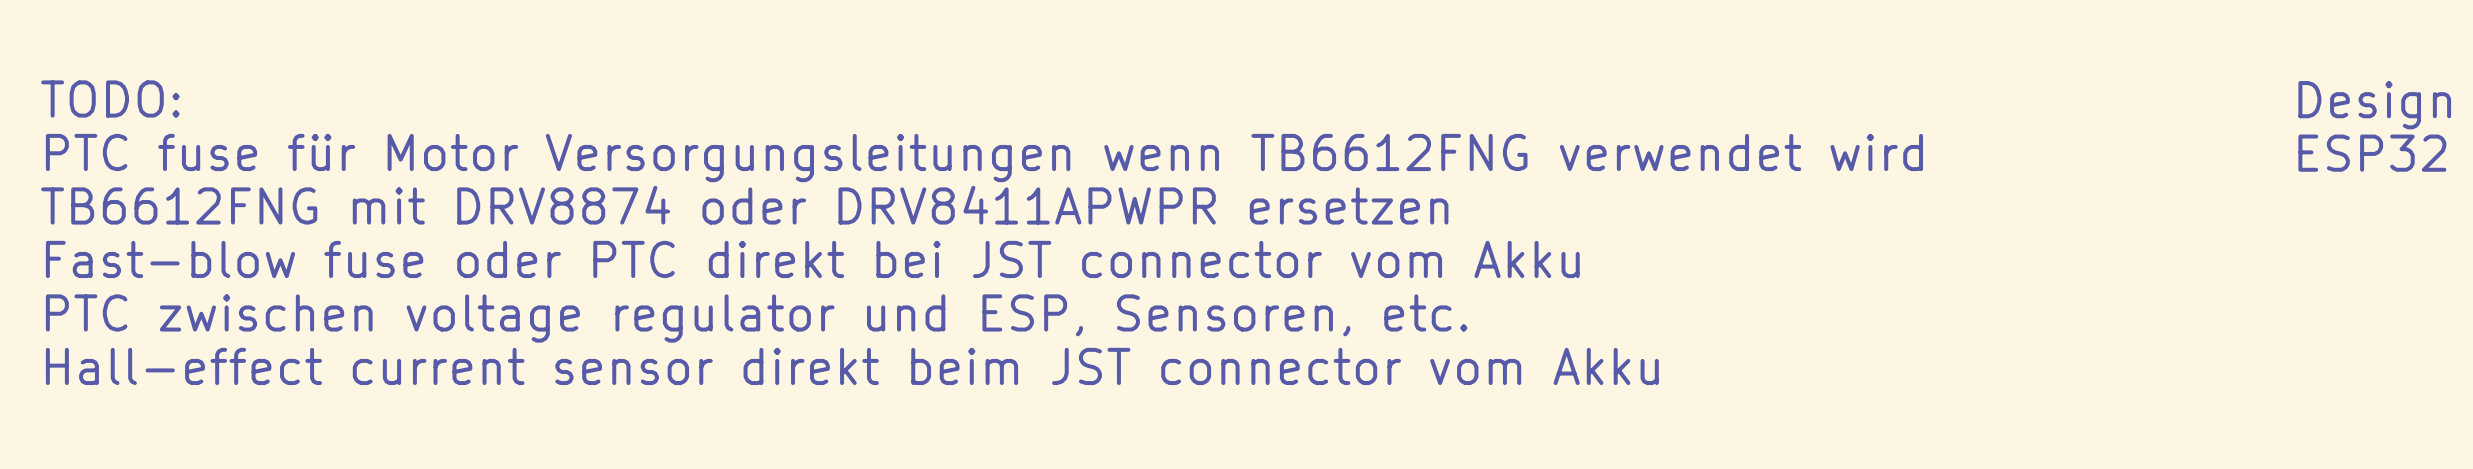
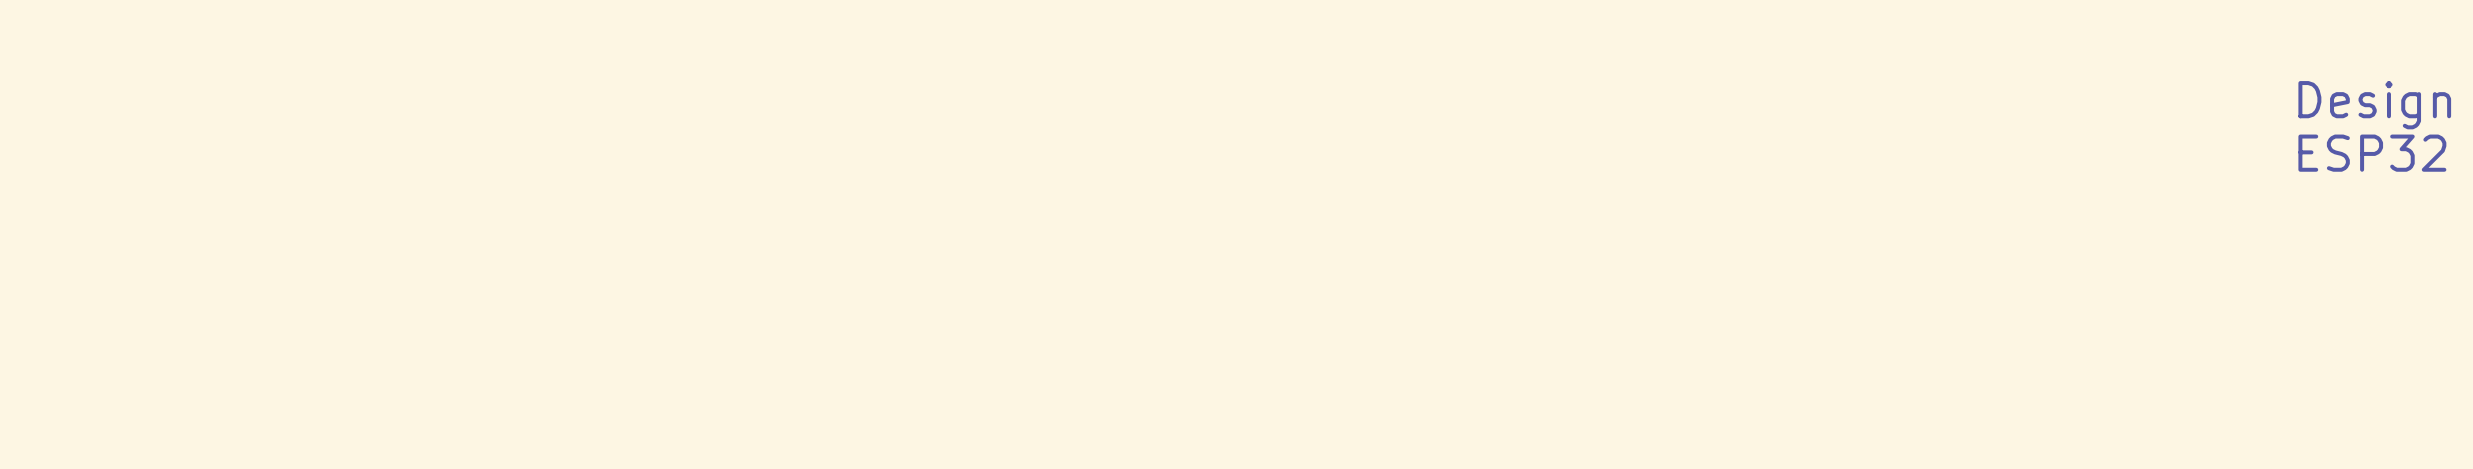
text: TODO: (110, 98) -> none
text: PTC fuse für Motor Versorgungsleitungen wenn TB6612FNG verwendet wird (984, 158) -> none
text: TB6612FNG mit DRV8874 oder DRV8411APWPR ersetzen (744, 205) -> none
text: Fast-blow fuse oder PTC direkt bei JST connector vom Akku (812, 259) -> none
text: PTC zwischen voltage regulator und ESP, Sensoren, etc. (756, 318) -> none
text: Hall-effect current sensor direkt beim JST connector vom Akku (852, 366) -> none

